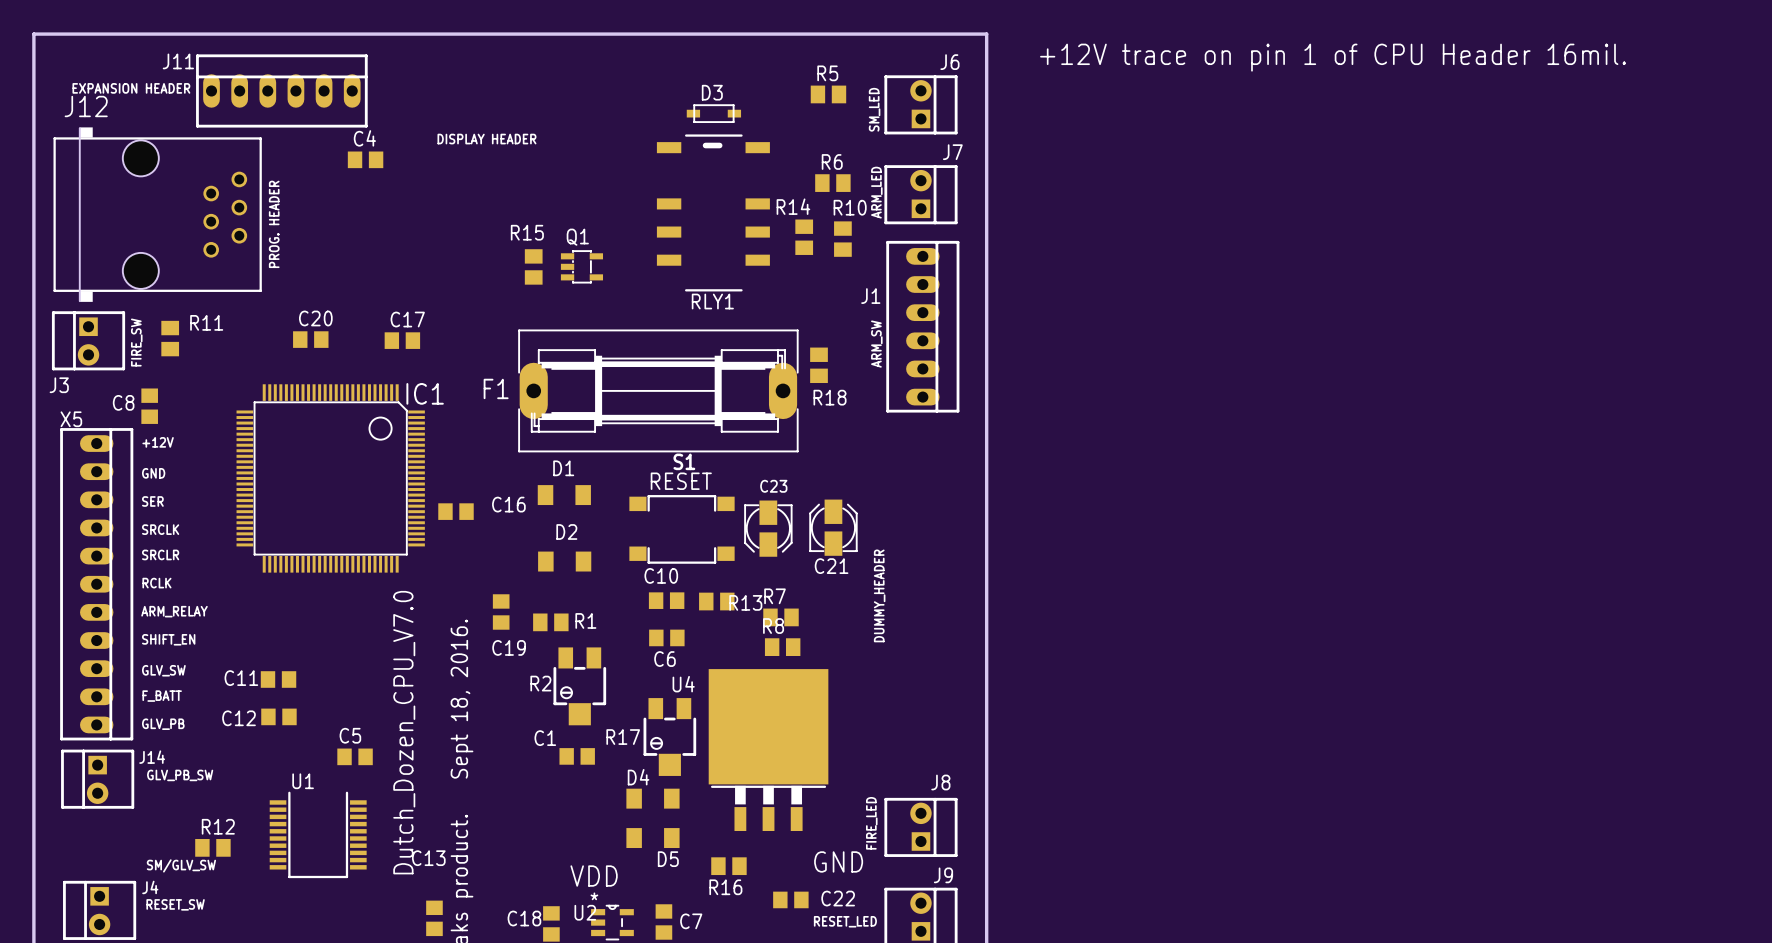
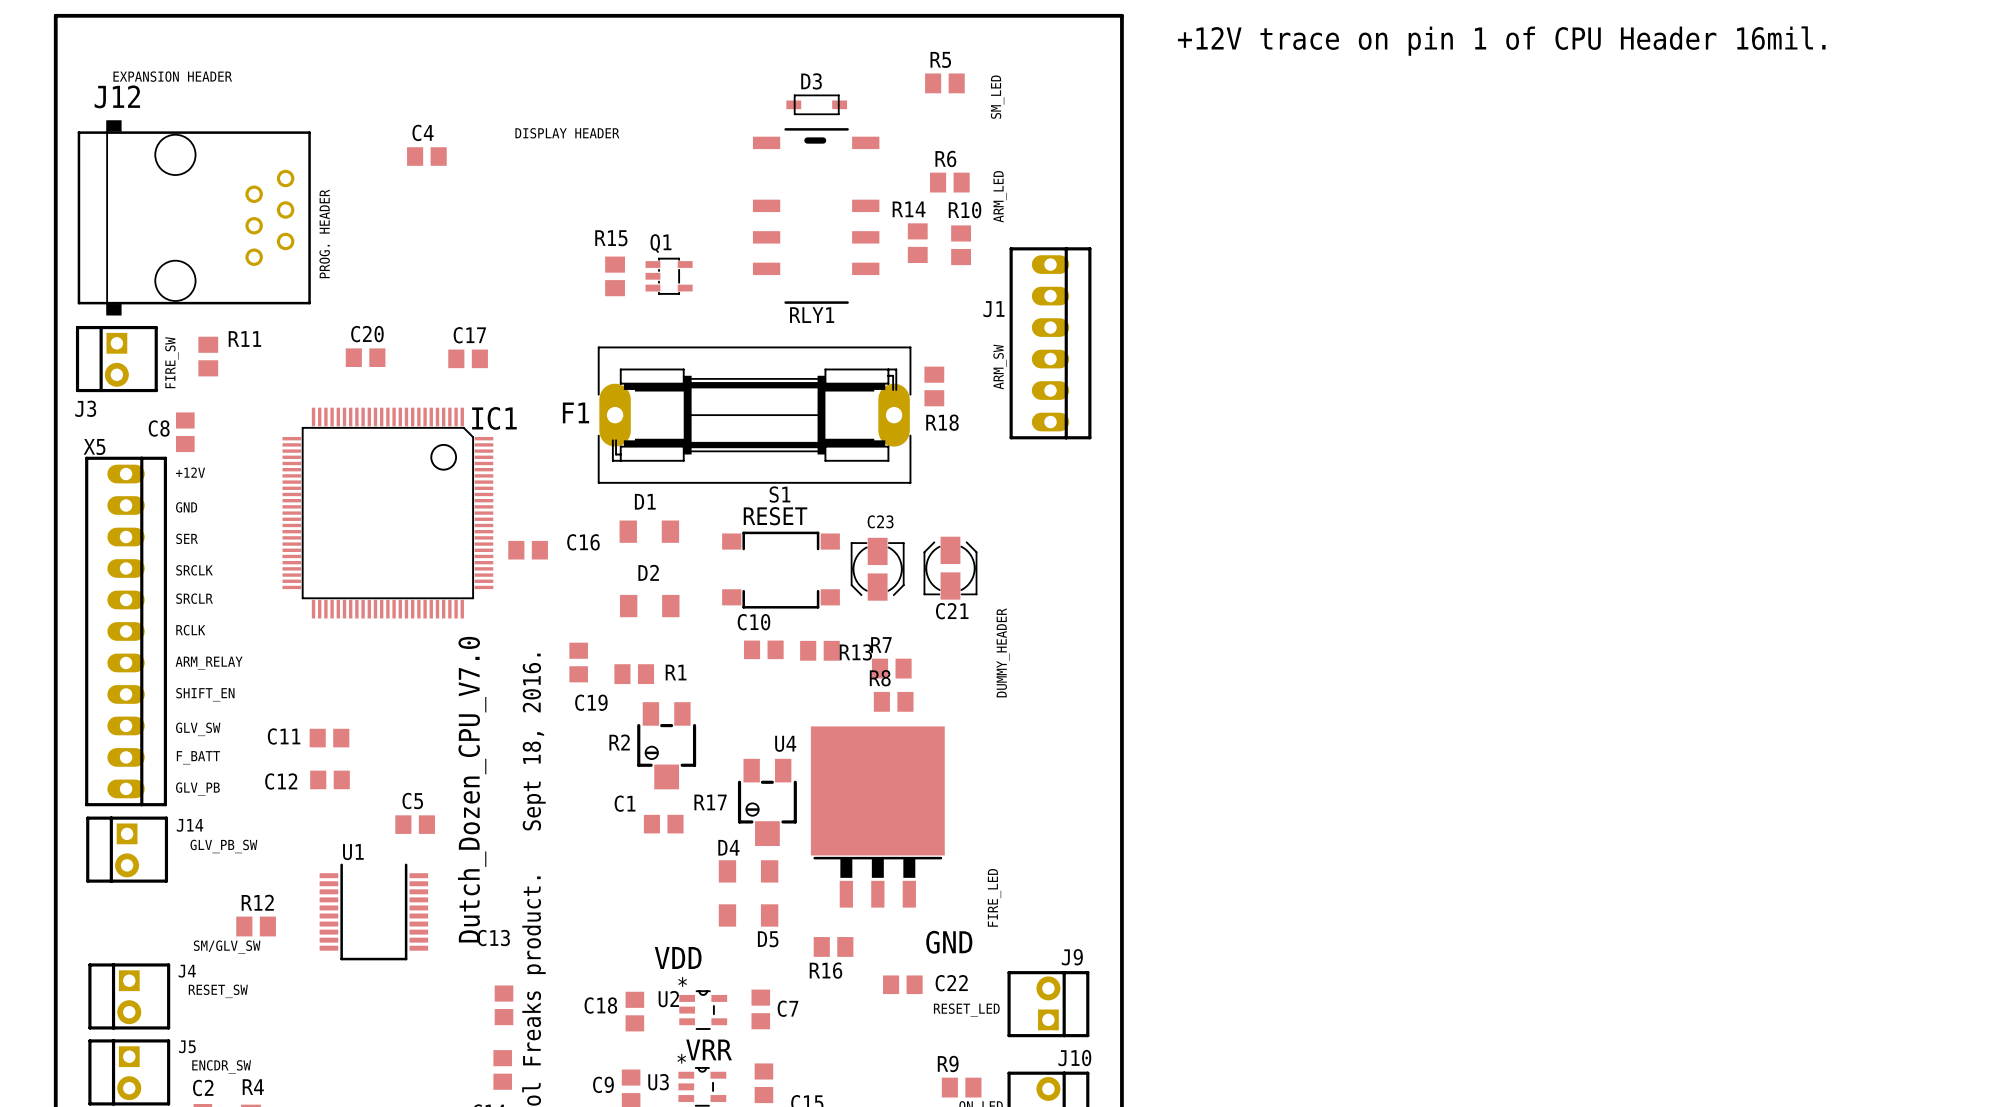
J11: (281, 90) -> none
J6: (920, 104) -> none
J7: (920, 194) -> none
C6: (666, 637) -> none
J8: (920, 827) -> none

